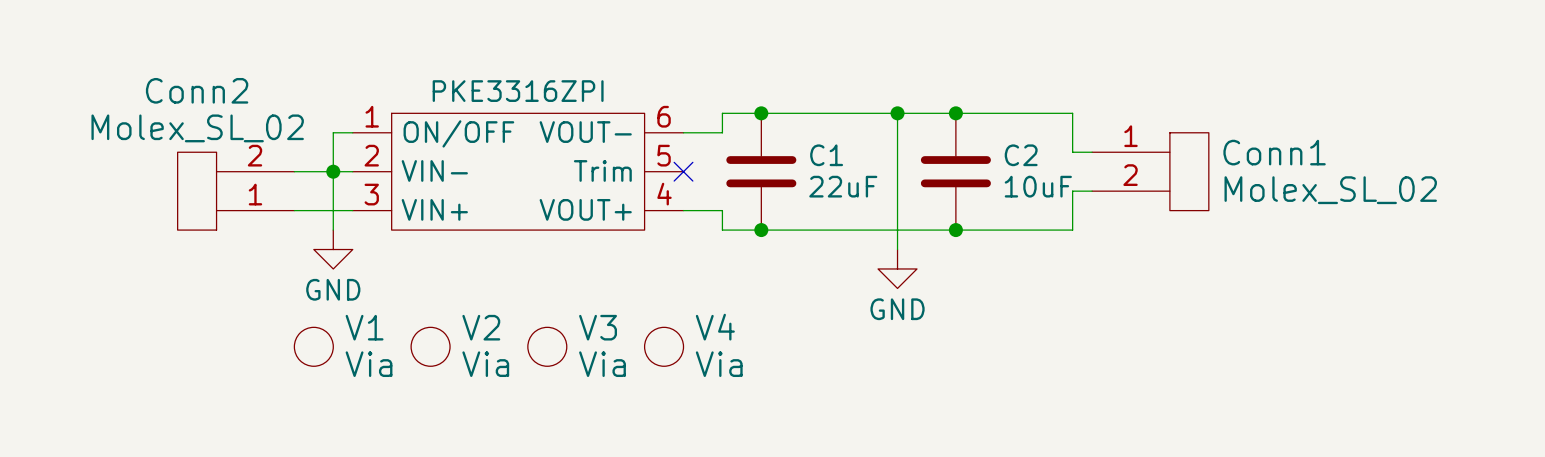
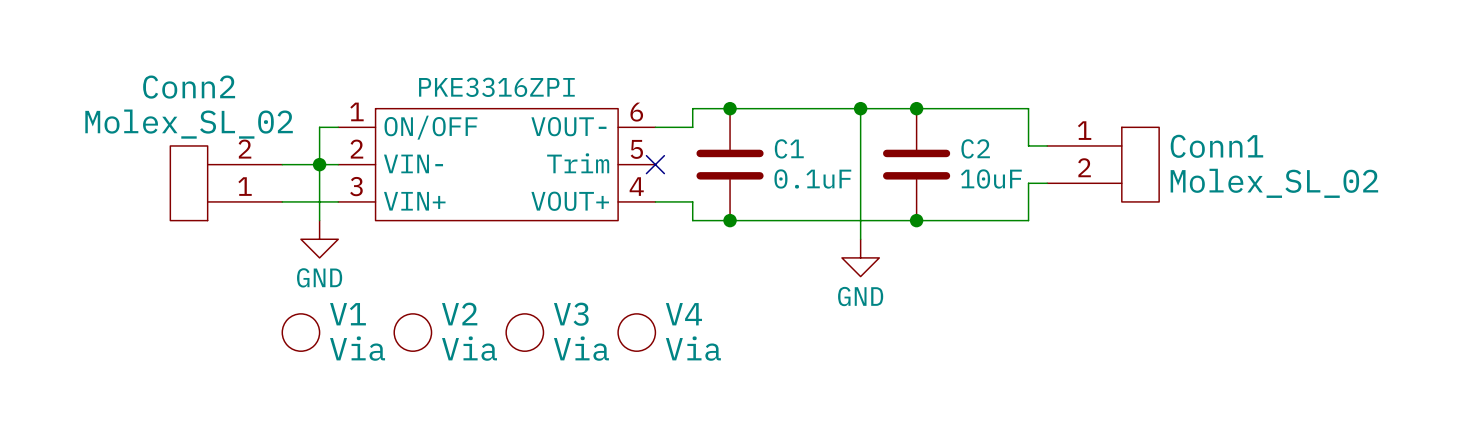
C1 value: 22uF (843, 186) -> 0.1uF (812, 178)

